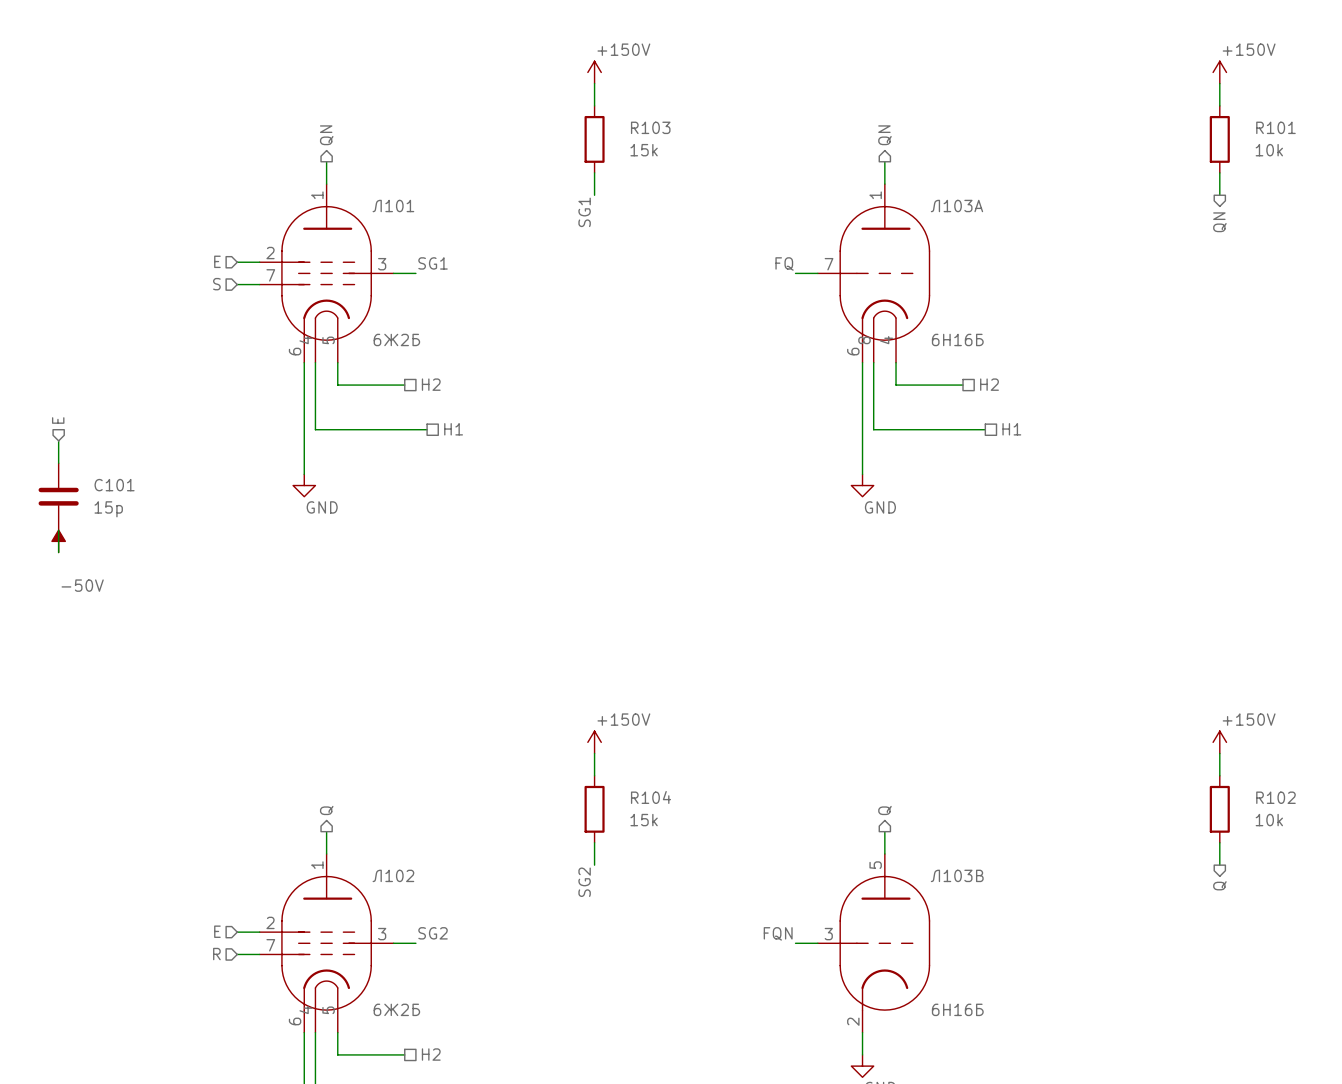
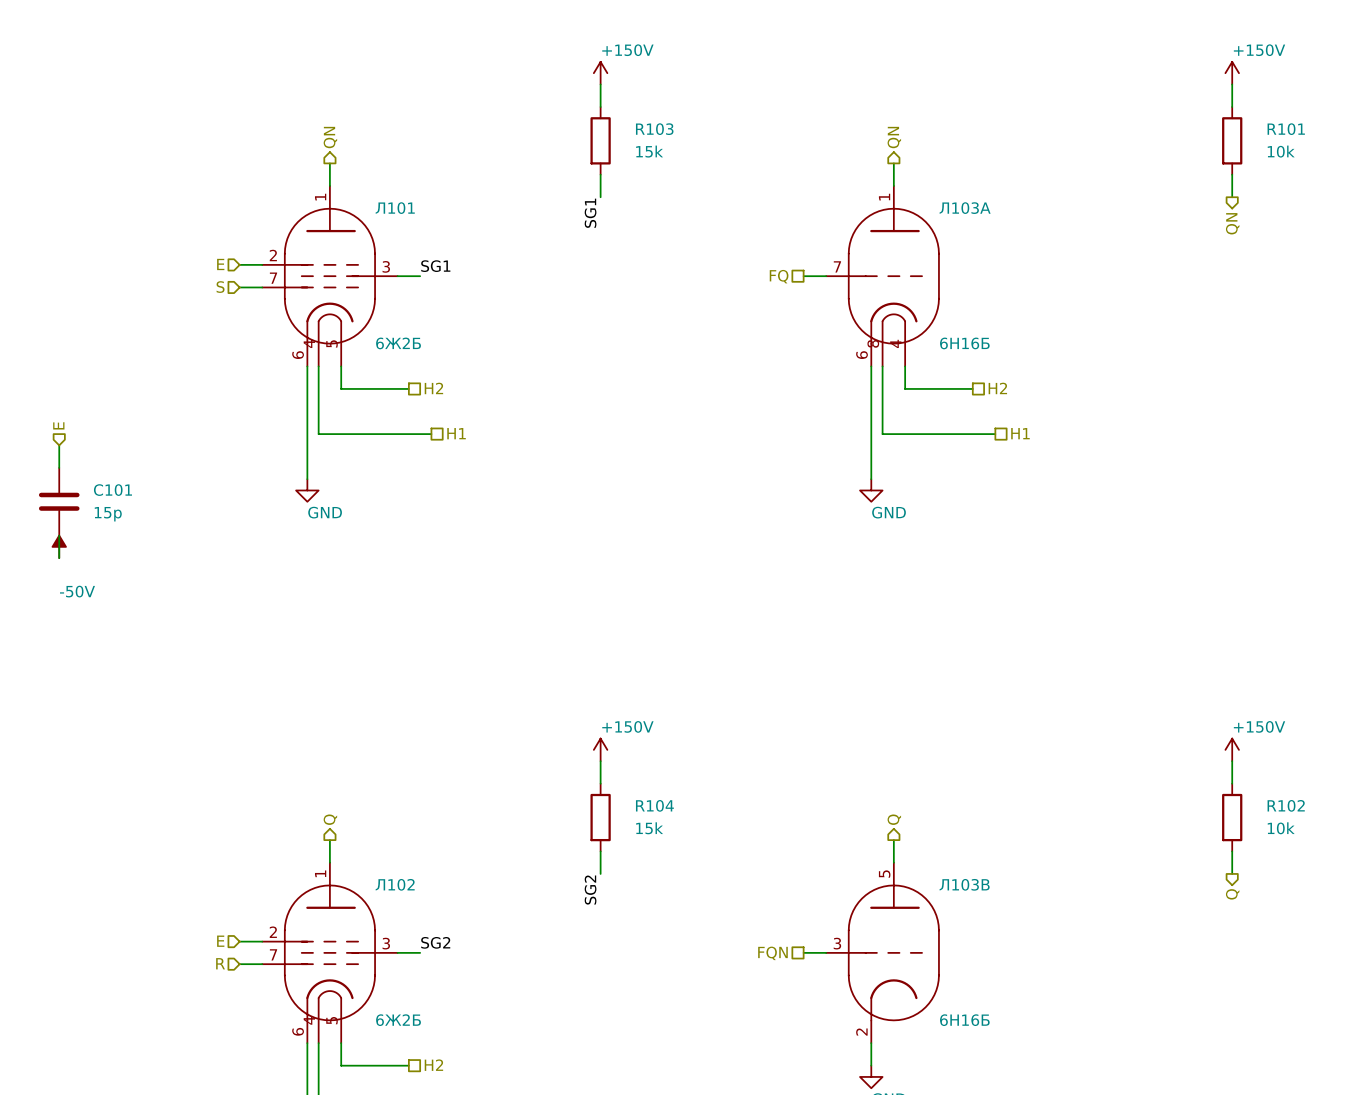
label: FQ (784, 263) -> none
hierarchical label: none -> FQ (779, 276)
label: FQN (778, 933) -> none
hierarchical label: none -> FQN (772, 953)

